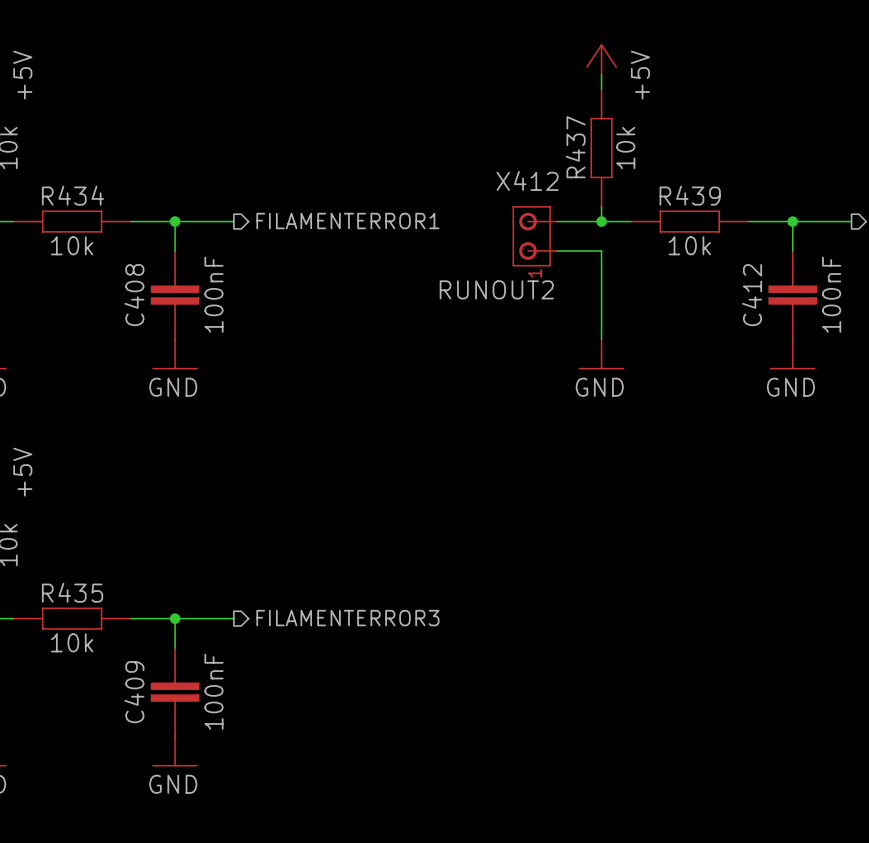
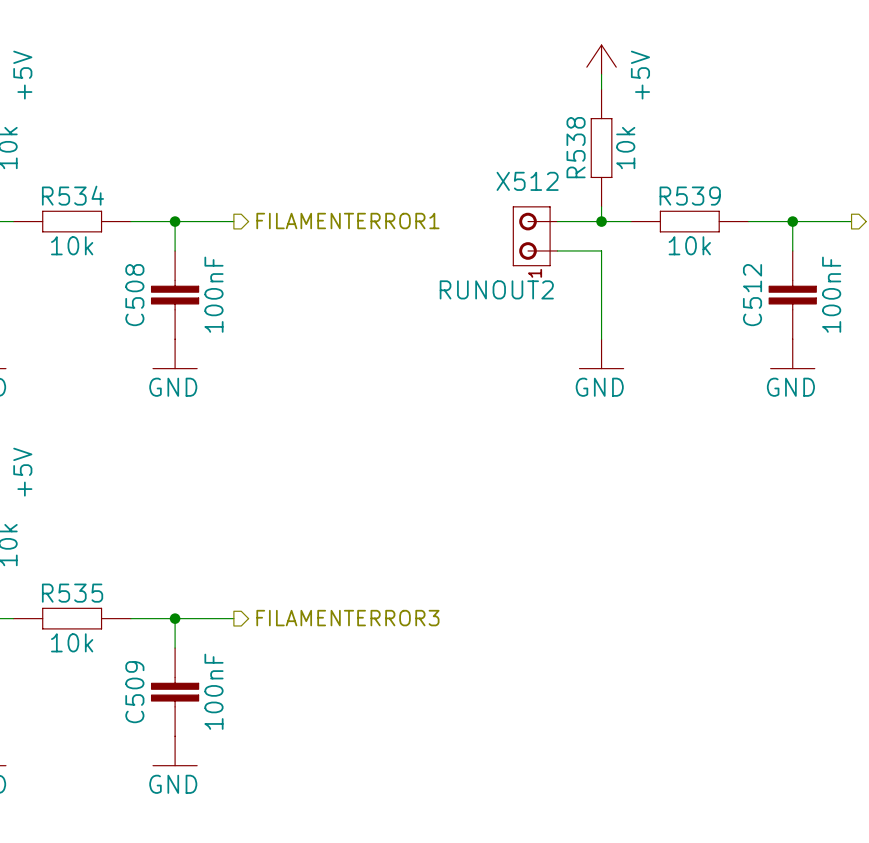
R437 name: R437 (575, 147) -> R538 (576, 147)
X412 name: X412 (527, 180) -> X512 (527, 181)
R434 name: R434 (72, 195) -> R534 (72, 195)
R439 name: R439 (690, 195) -> R539 (690, 196)
C408 name: C408 (134, 295) -> C508 (134, 295)
C412 name: C412 (752, 295) -> C512 (752, 295)
R435 name: R435 (72, 592) -> R535 (72, 593)
C409 name: C409 (134, 692) -> C509 (134, 692)

